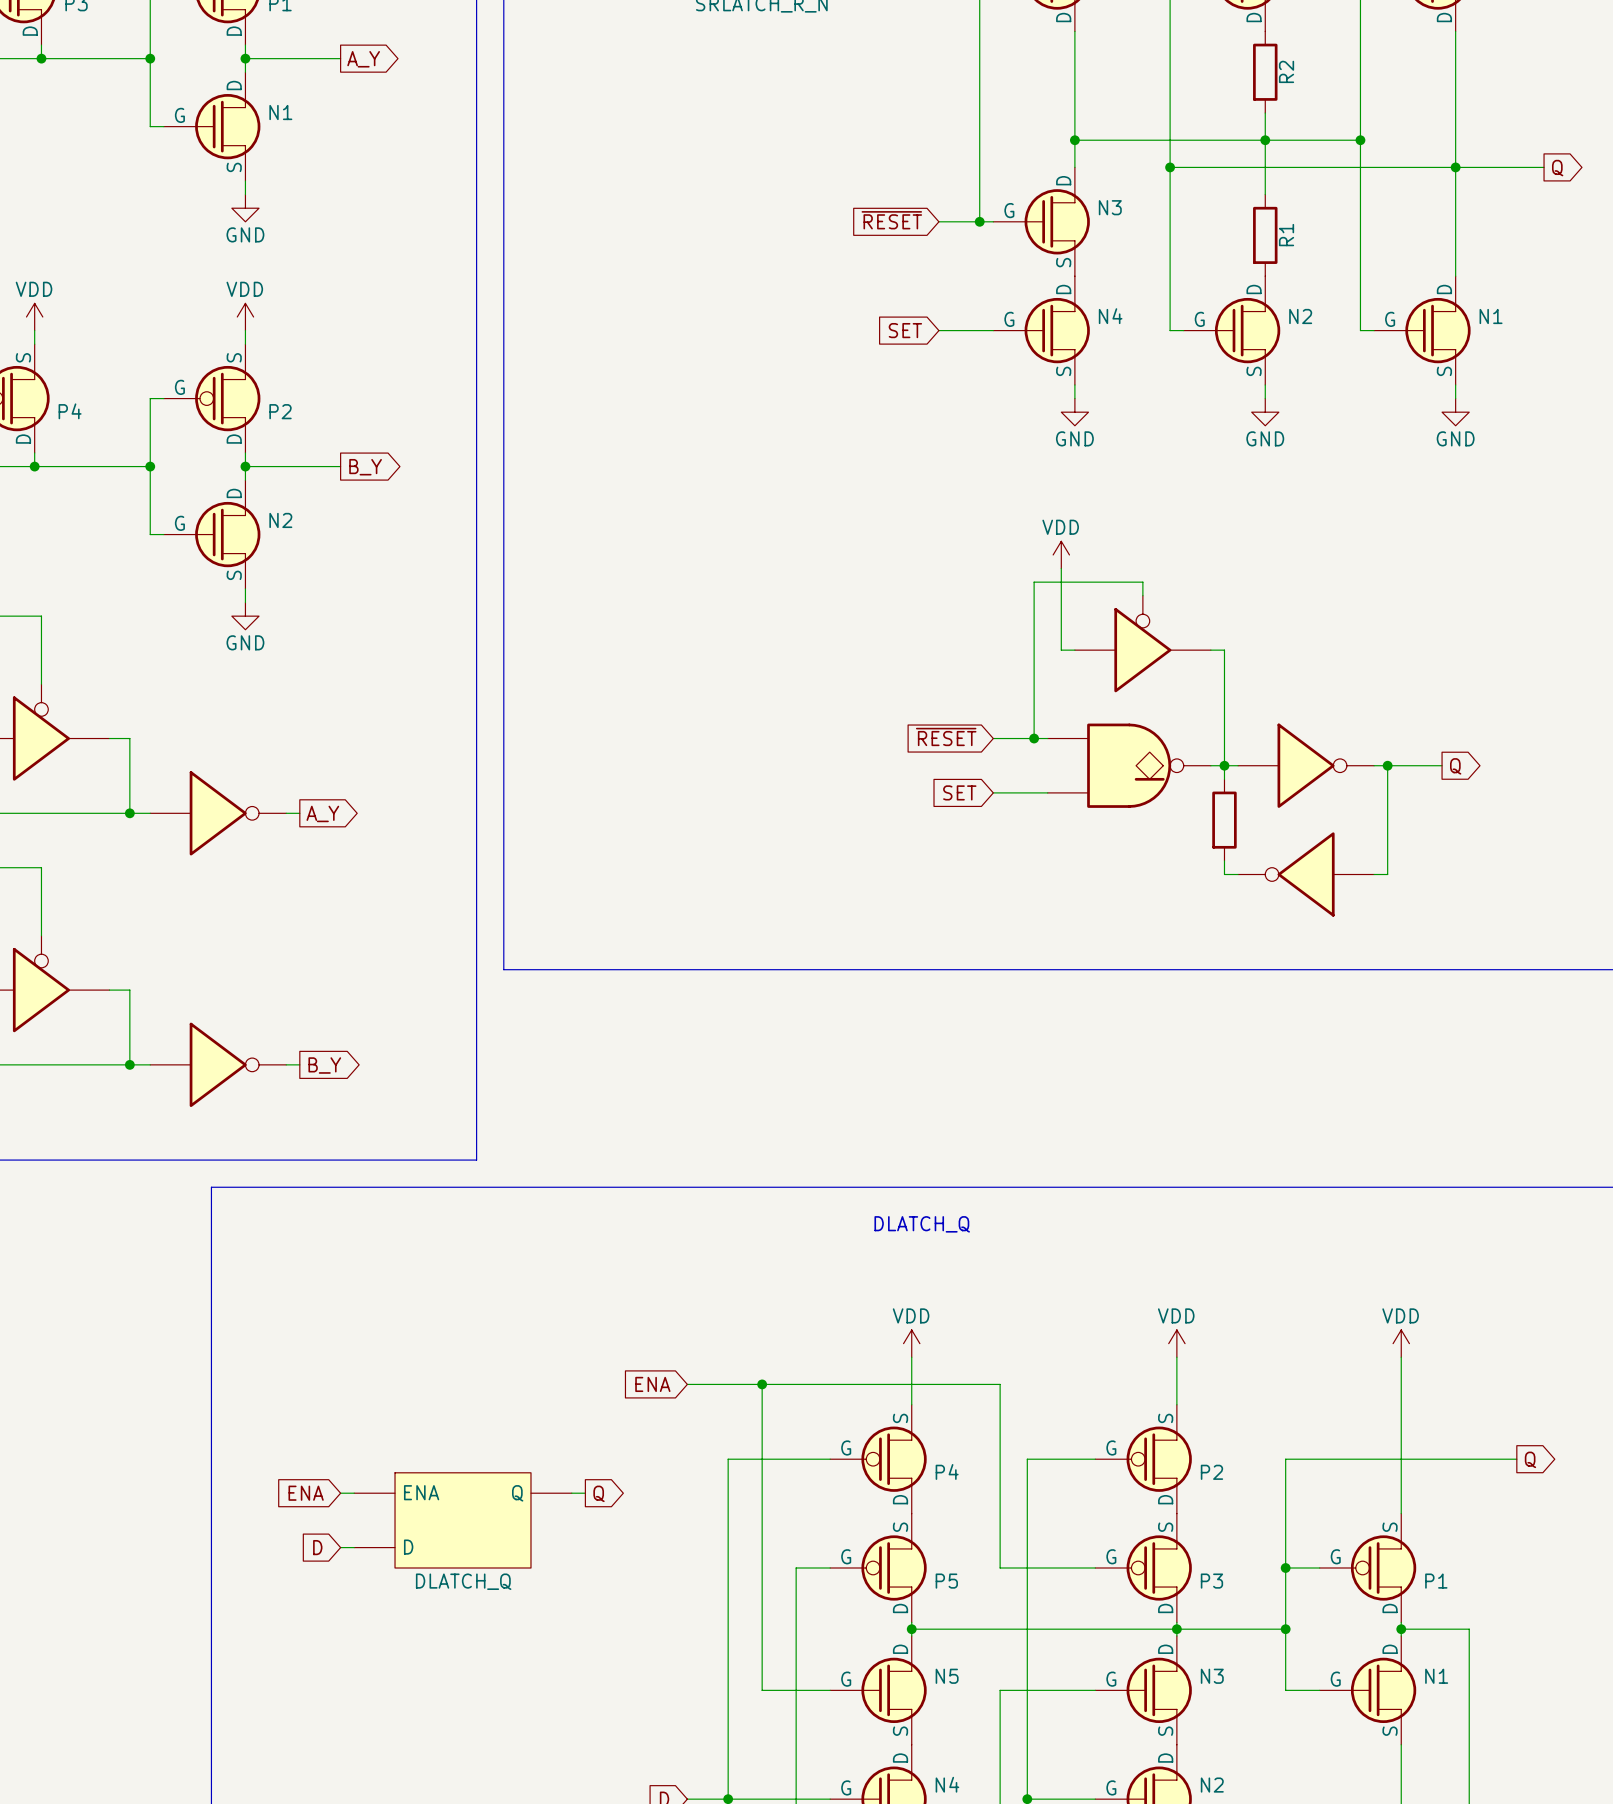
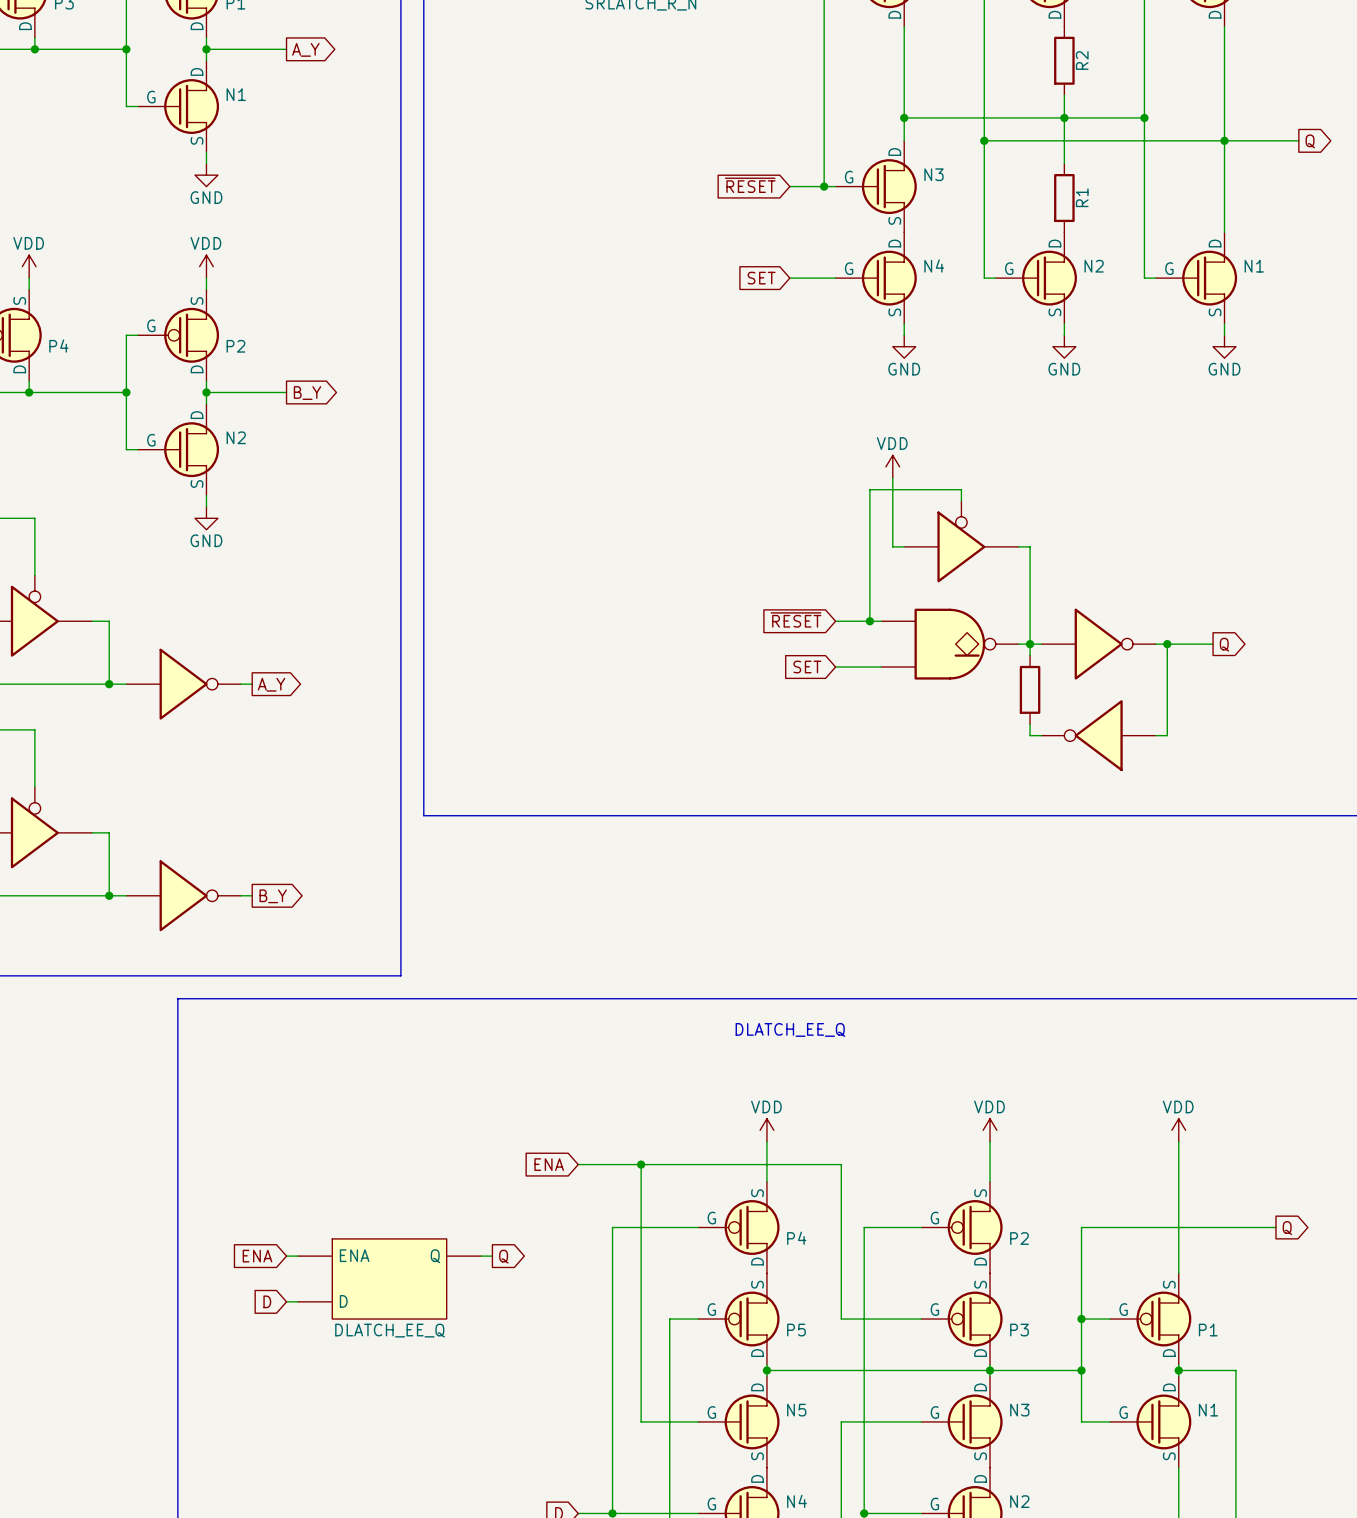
text: DLATCH_Q (922, 1224) -> DLATCH_EE_Q (790, 1029)
part value: DLATCH_Q (463, 1581) -> DLATCH_EE_Q (390, 1330)

